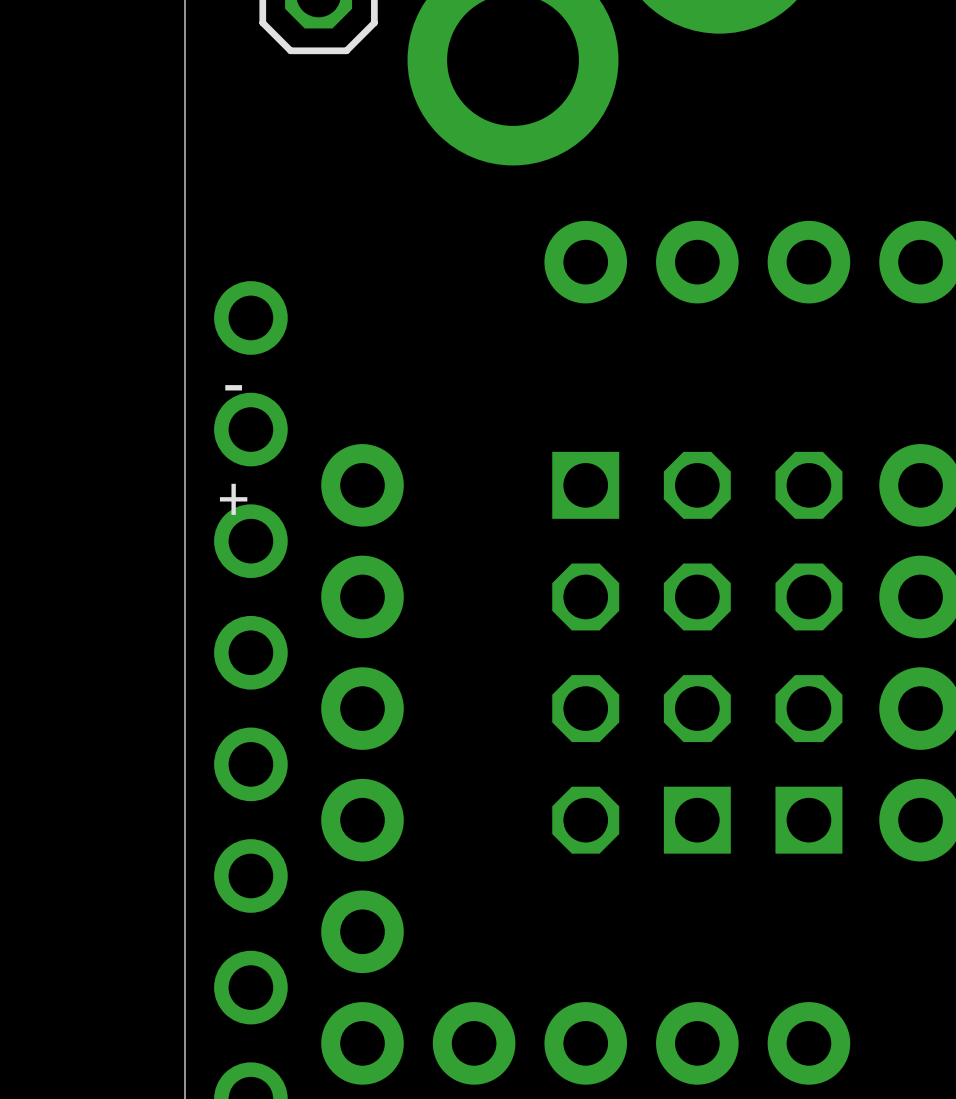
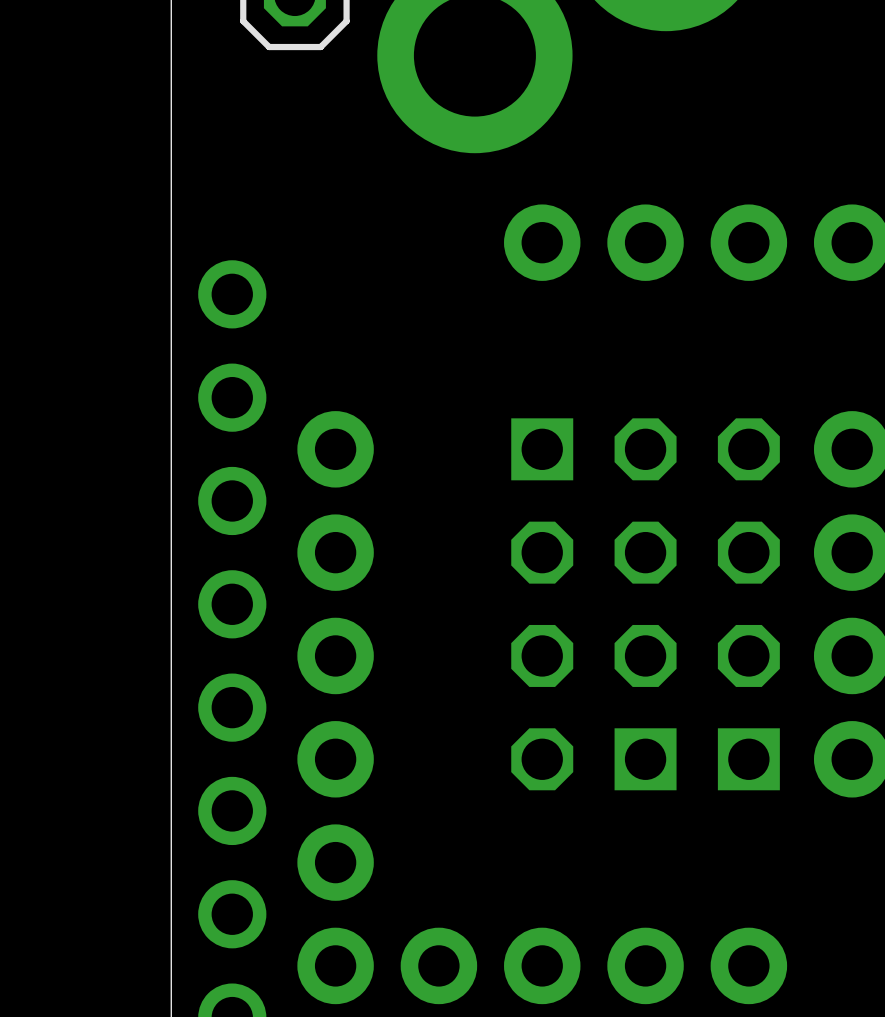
text: - (233, 387) -> none
text: + (233, 499) -> none

